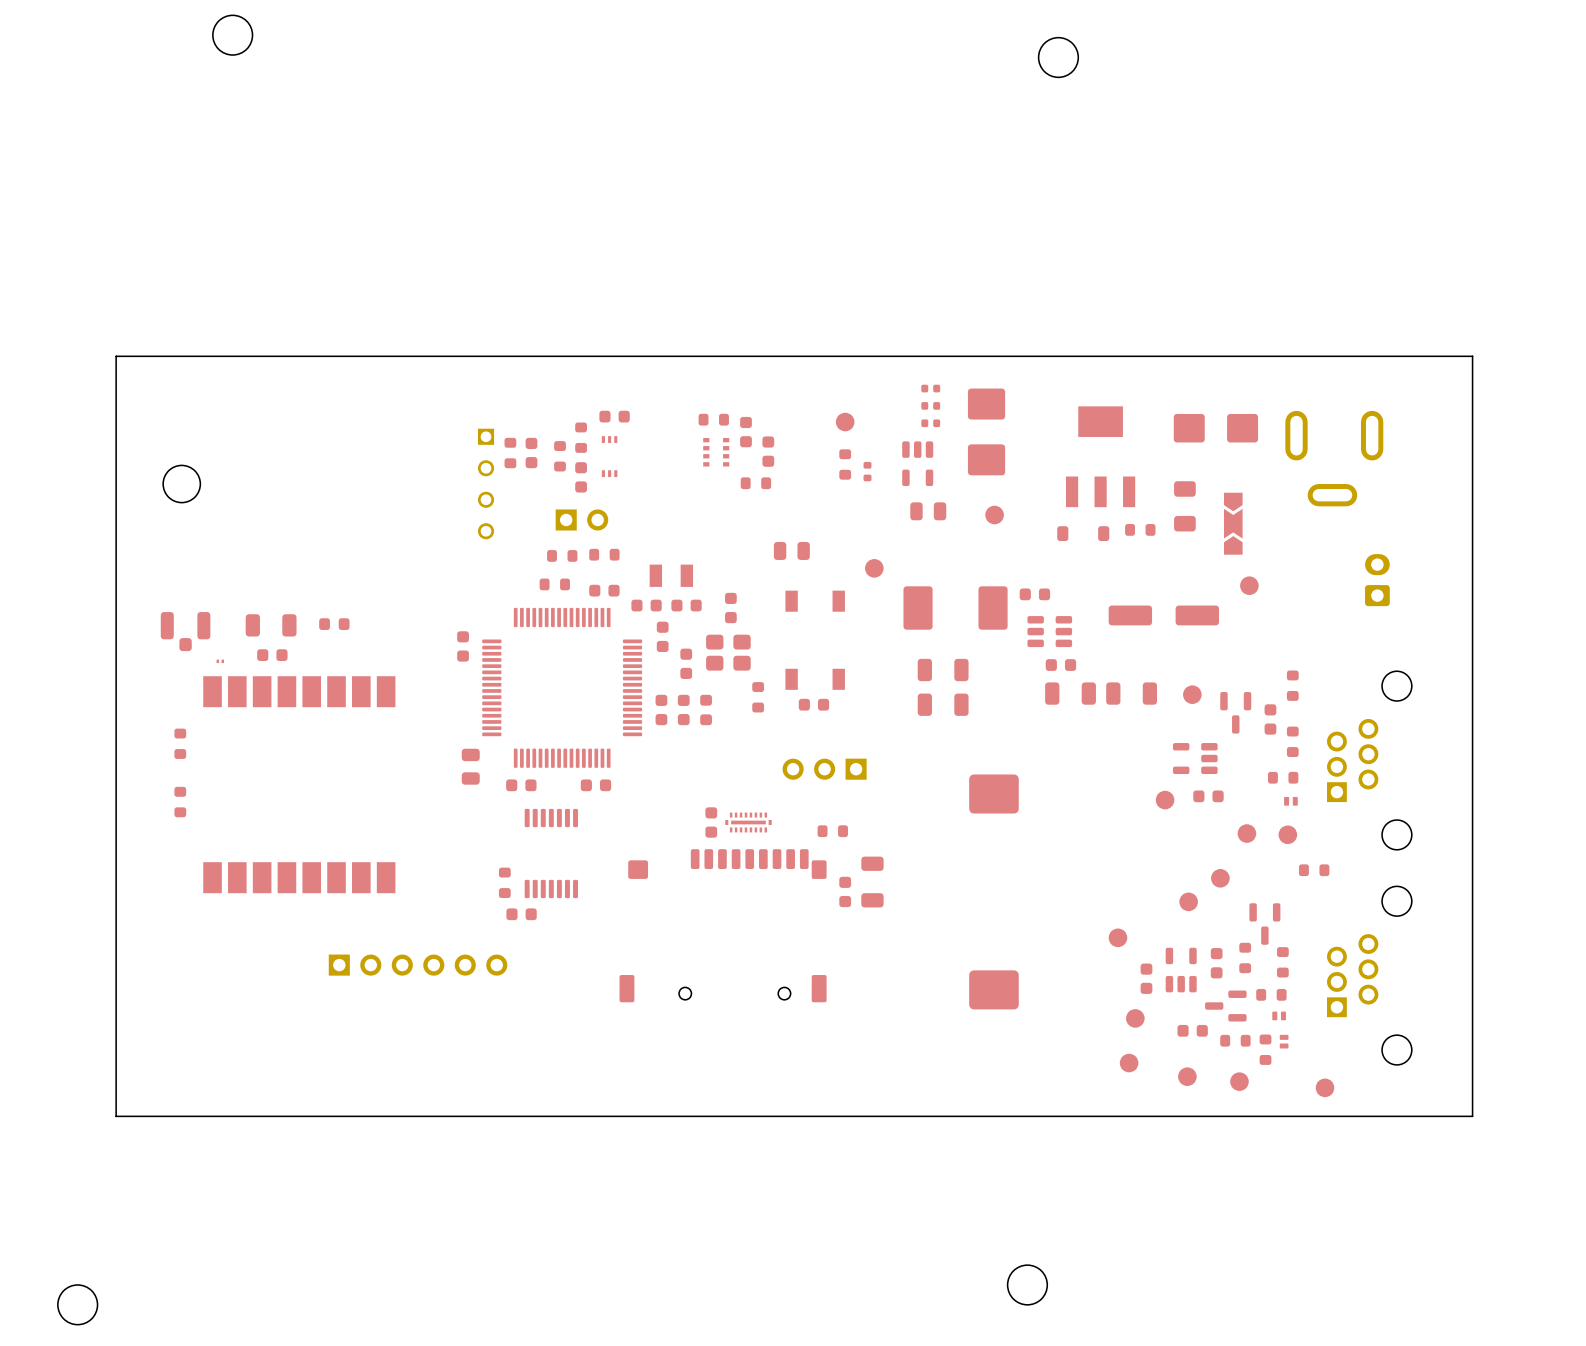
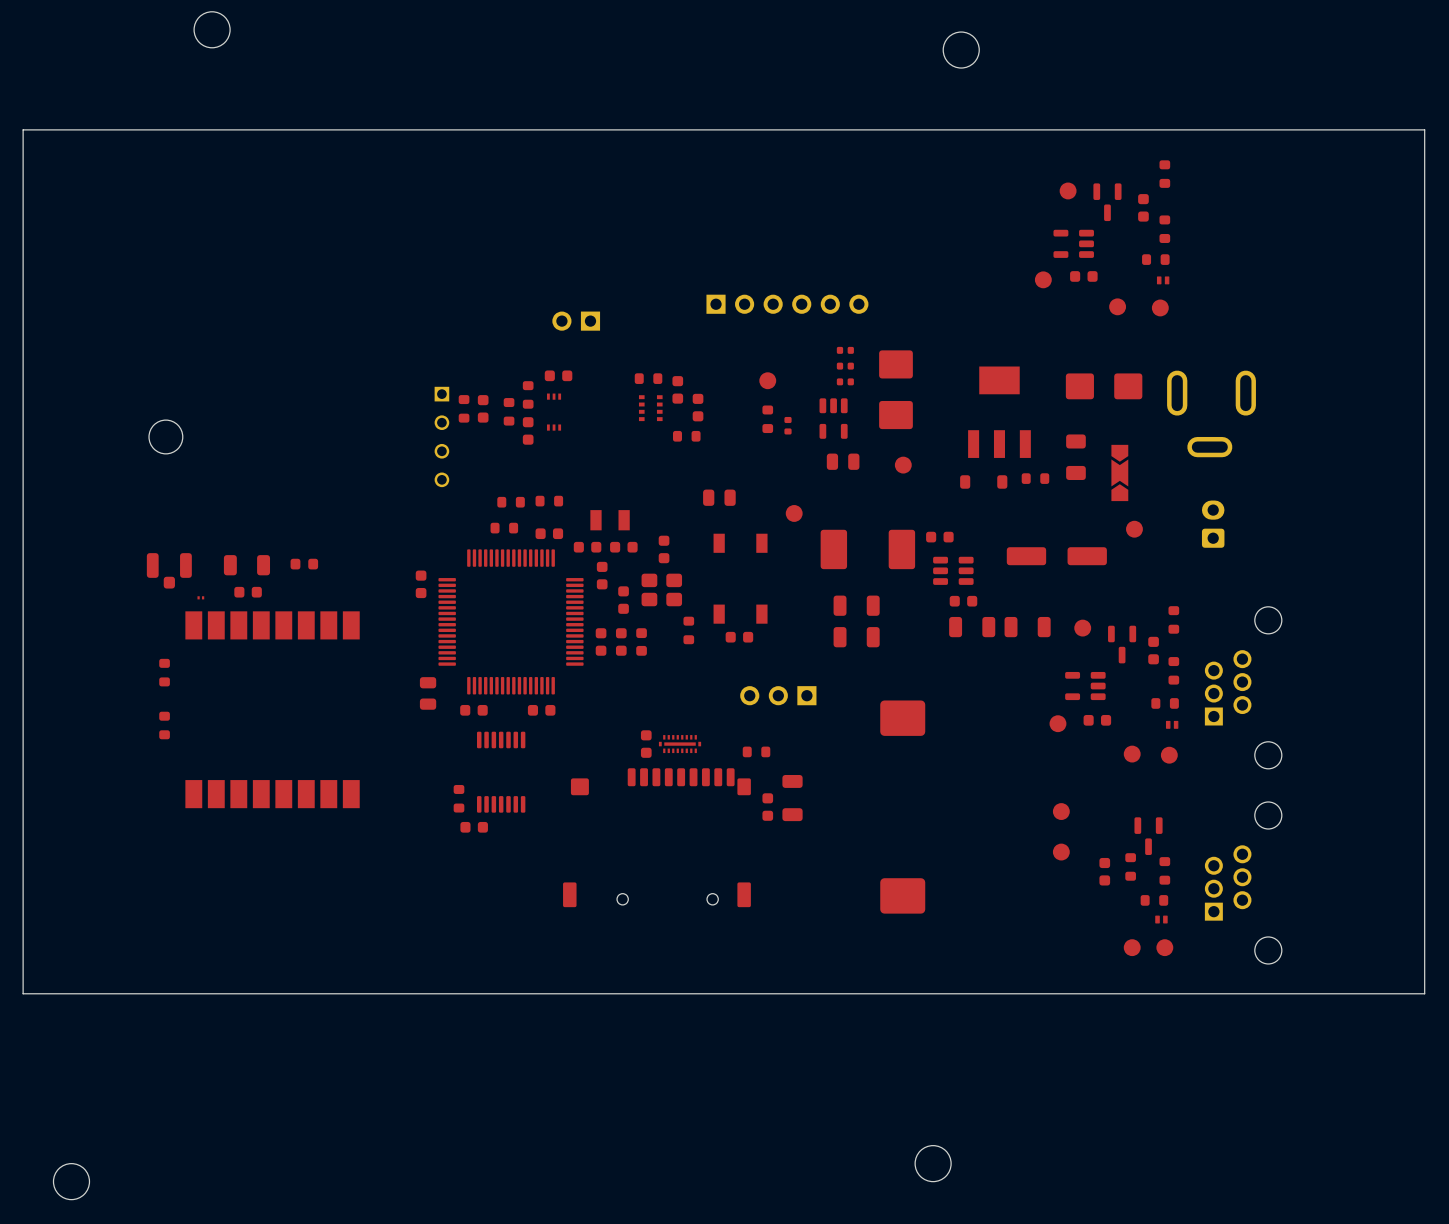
part: none -> (1164, 174)
part: none -> (1068, 190)
part: none -> (1107, 202)
part: none -> (1143, 207)
part: none -> (1164, 229)
part: none -> (1073, 243)
part: none -> (1155, 259)
part: none -> (1083, 276)
part: none -> (1043, 279)
part: none -> (1163, 280)
part: none -> (787, 304)
part: none -> (1117, 306)
part: none -> (1160, 307)
board edge: (1472, 356) (116, 356) (116, 1116) (1472, 1116) (1472, 356) -> (1424, 129) (1424, 993) (23, 993) (23, 129) (1424, 129)
part rotation: 0° (581, 519) -> 180° (576, 321)
part position: (581, 519) -> (576, 321)
part position: (1377, 580) -> (1213, 524)
part position: (824, 769) -> (778, 695)
part: (1314, 870) -> none
part: (1220, 878) -> none
part position: (1188, 901) -> (1061, 811)
part: (1117, 937) -> none
part: none -> (1061, 852)
part: (418, 965) -> none
part: (1181, 970) -> none
part: (1146, 978) -> none
part: (1225, 1006) -> none
part: (1135, 1018) -> none
part: (1192, 1030) -> none
part footprint: [1279, 1034, 1289, 1049] -> [1156, 939, 1174, 957]
part: (1235, 1040) -> none
part: none -> (1132, 947)
part: (1265, 1049) -> none
part: (1129, 1063) -> none
part: (1187, 1076) -> none
part: (1239, 1081) -> none
part: (1325, 1087) -> none

